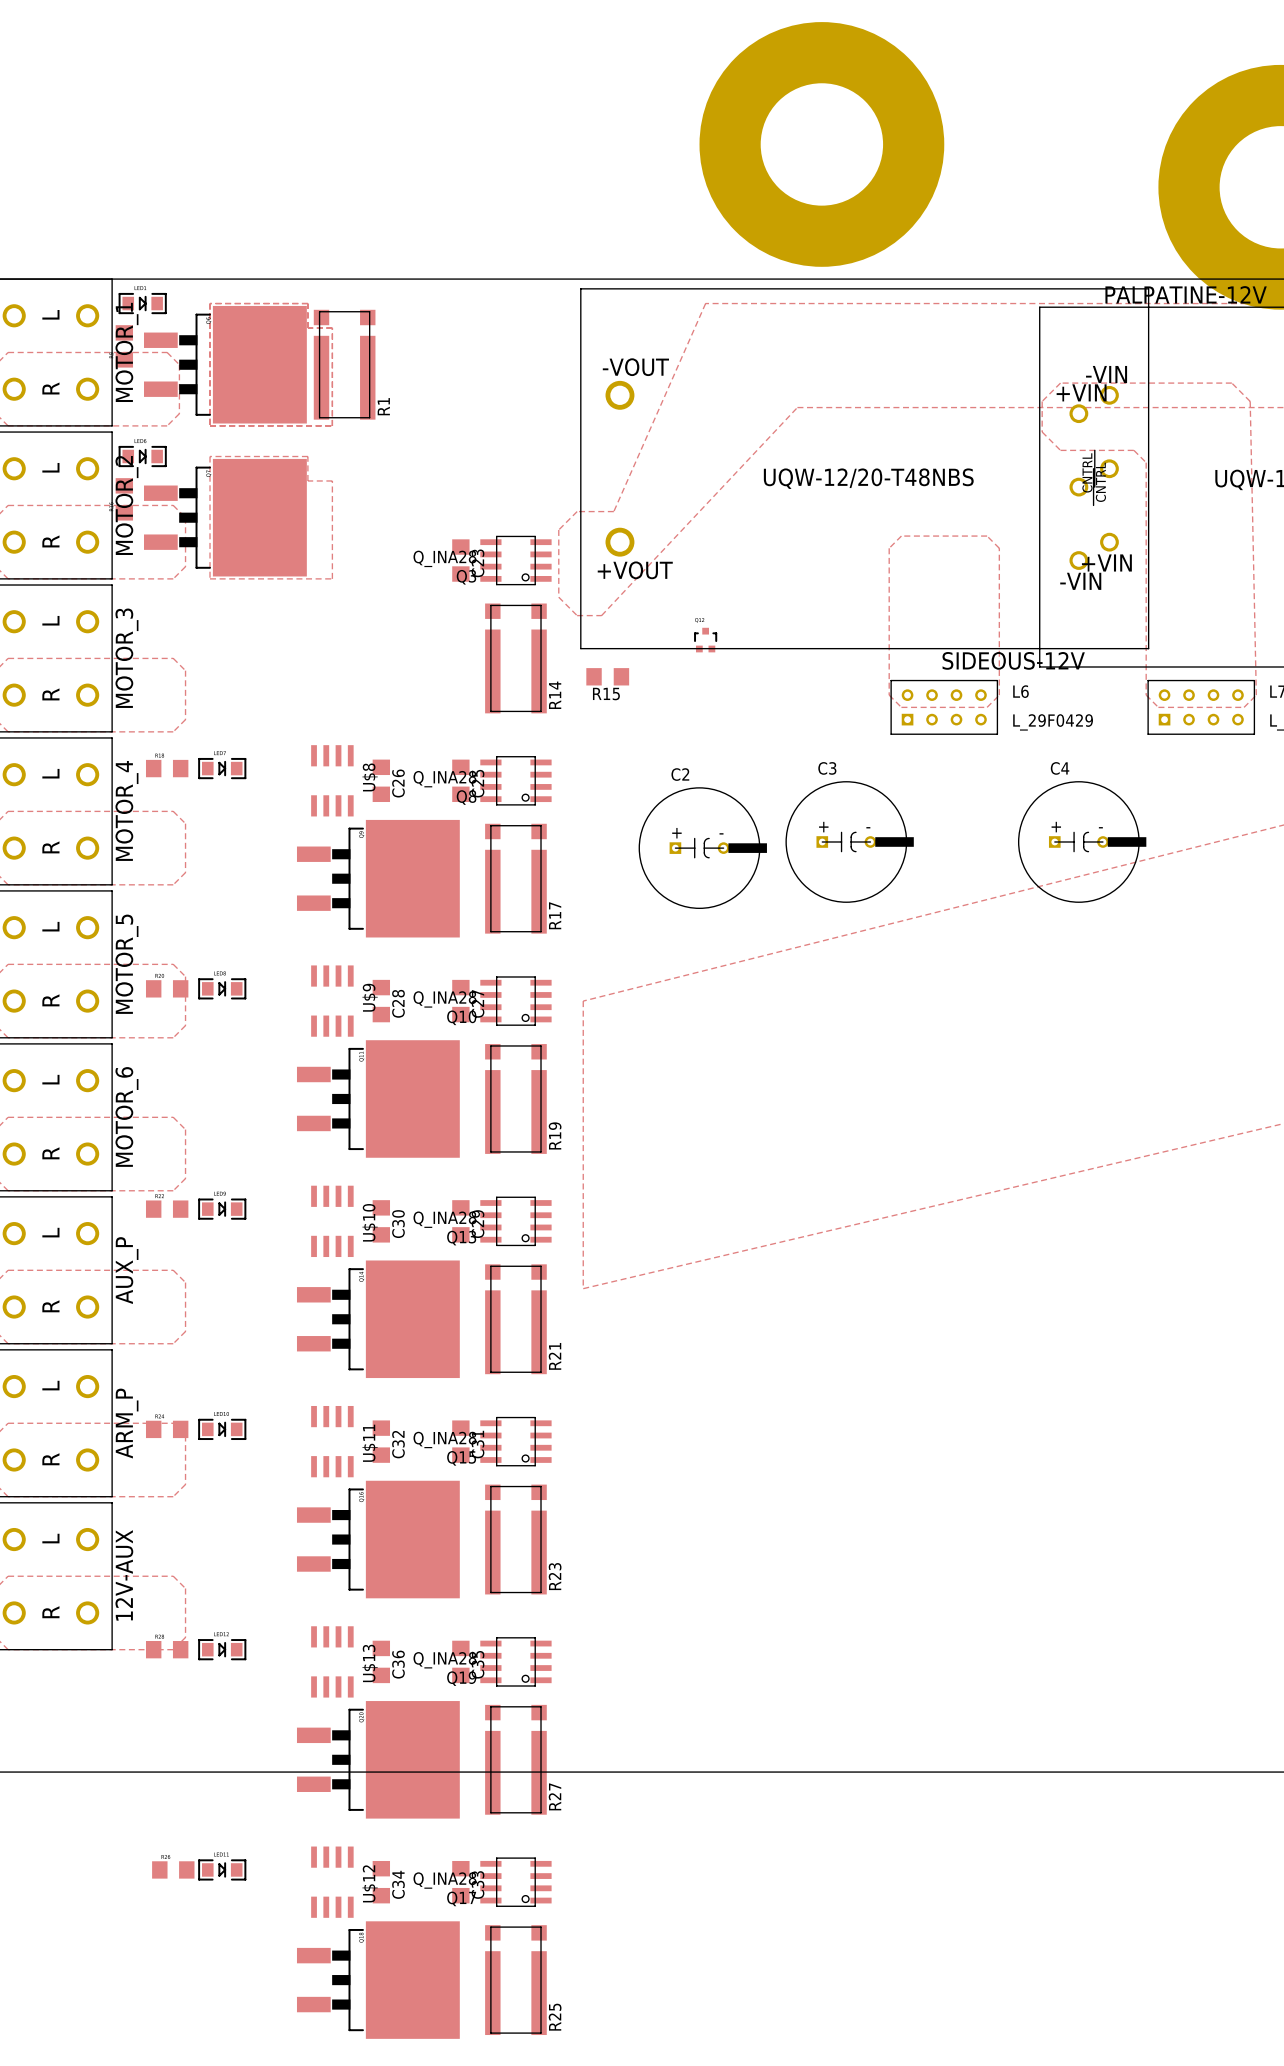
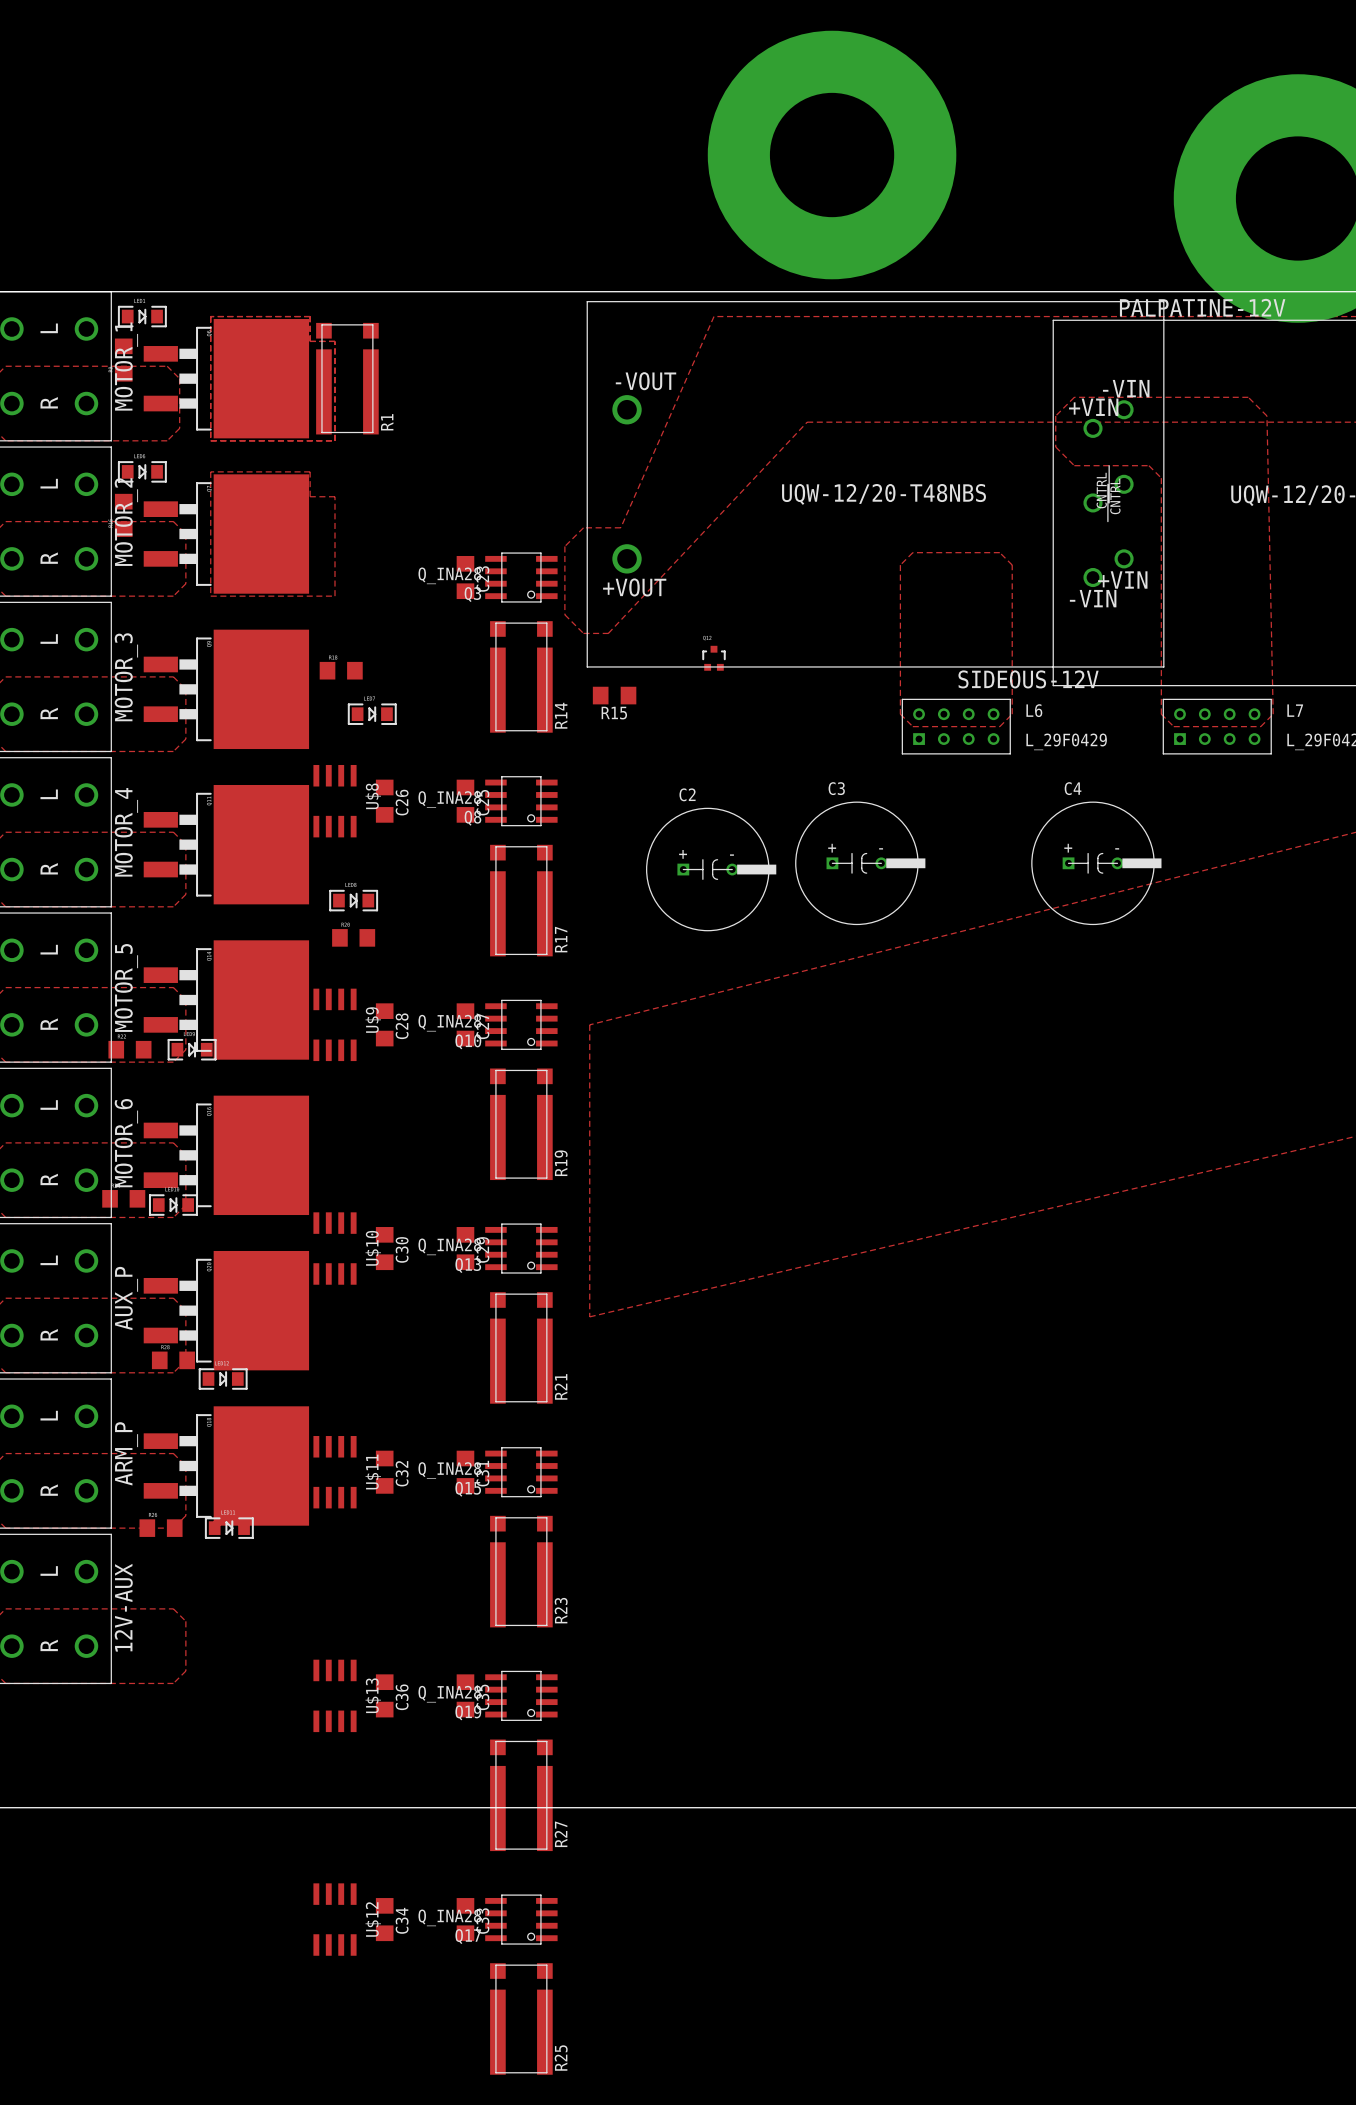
part position: (167, 768) -> (341, 670)
part position: (222, 768) -> (372, 714)
part position: (378, 878) -> (226, 689)
part position: (167, 988) -> (353, 937)
part position: (222, 988) -> (353, 900)
part position: (378, 1098) -> (226, 844)
part position: (167, 1209) -> (129, 1049)
part position: (222, 1209) -> (192, 1049)
part position: (378, 1319) -> (226, 1000)
part position: (167, 1429) -> (123, 1198)
part position: (222, 1429) -> (173, 1205)
part position: (378, 1539) -> (226, 1155)
part position: (167, 1649) -> (173, 1360)
part position: (222, 1649) -> (223, 1379)
part position: (378, 1759) -> (226, 1310)
part position: (173, 1869) -> (161, 1528)
part position: (222, 1869) -> (229, 1528)
part position: (378, 1980) -> (226, 1465)

